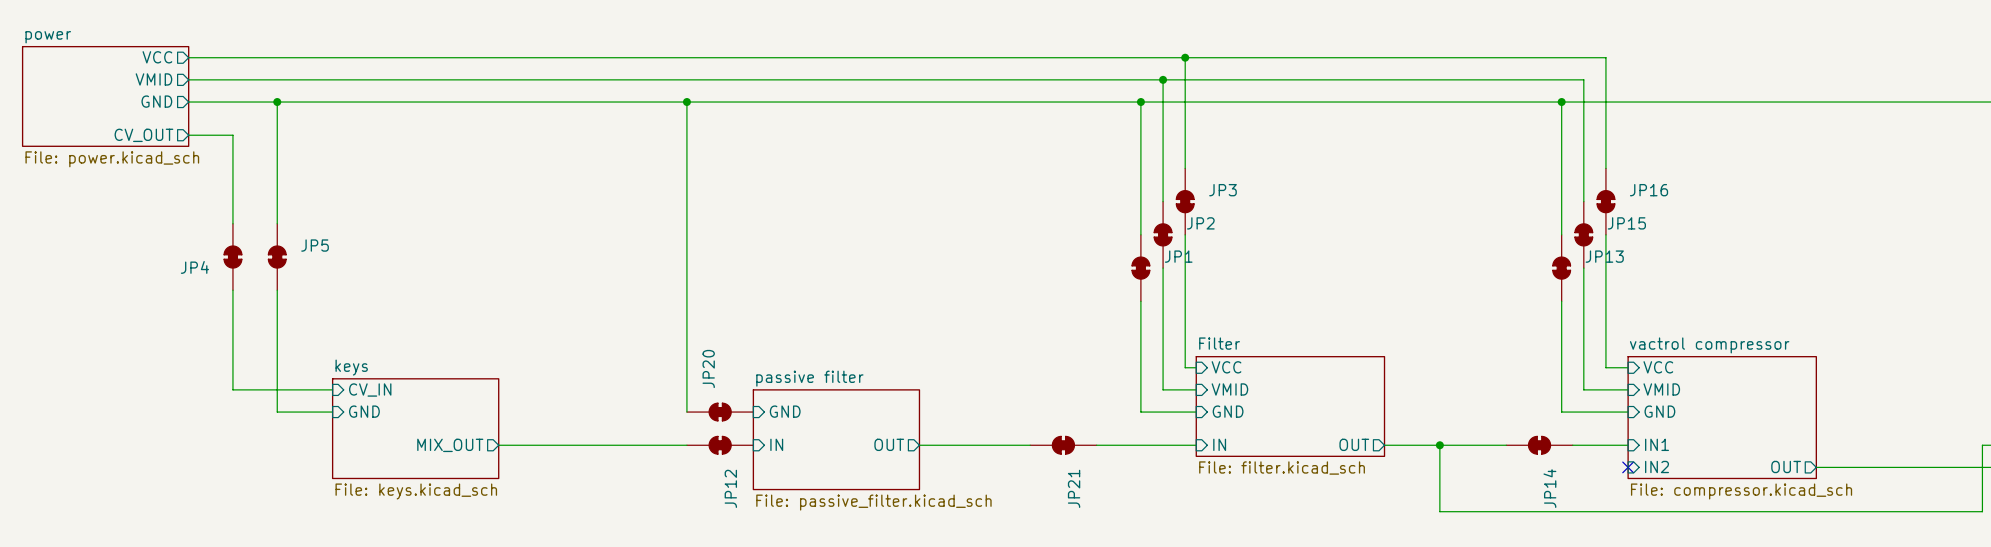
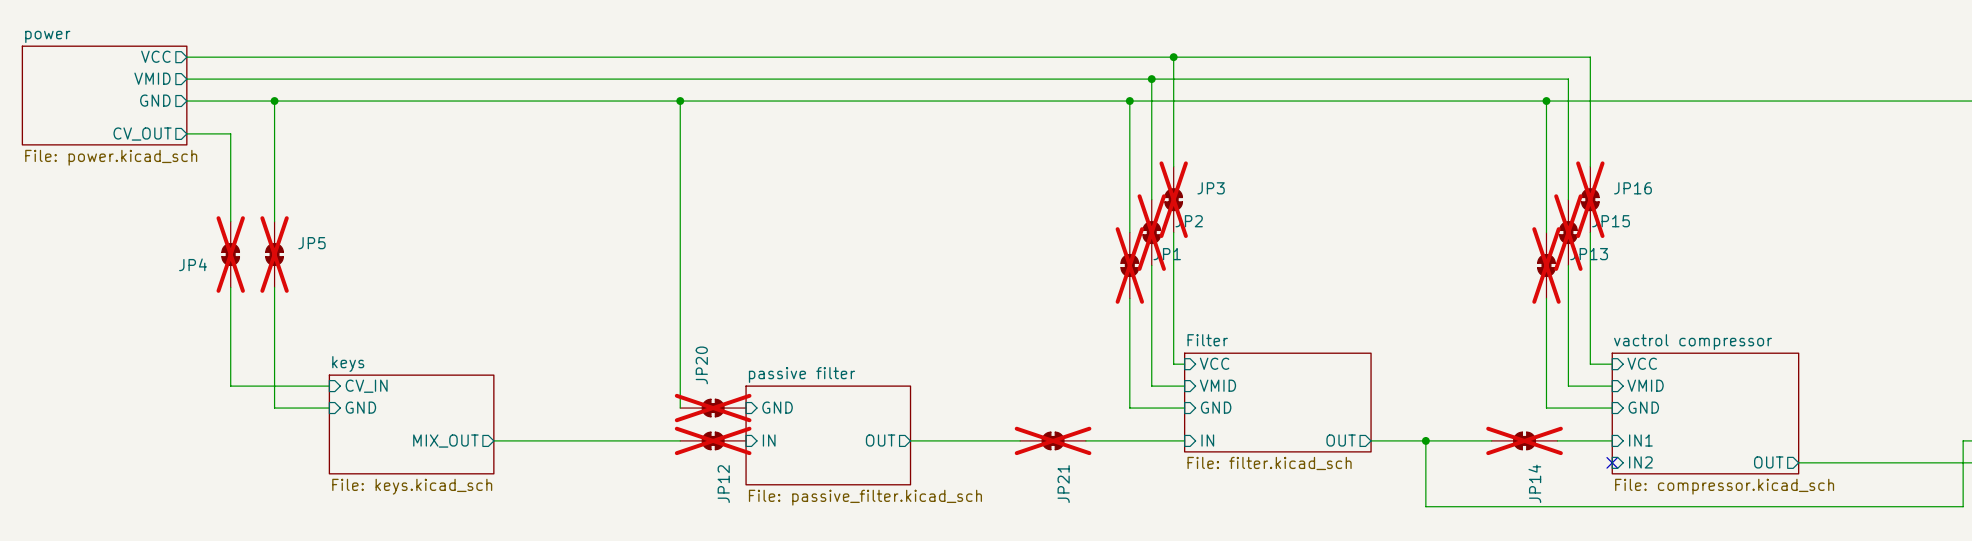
JP3 do-not-place cross: none -> (1173, 199)
JP16 do-not-place cross: none -> (1590, 199)
JP2 do-not-place cross: none -> (1151, 232)
JP15 do-not-place cross: none -> (1568, 232)
JP4 do-not-place cross: none -> (230, 254)
JP5 do-not-place cross: none -> (274, 254)
JP1 do-not-place cross: none -> (1129, 265)
JP13 do-not-place cross: none -> (1546, 265)
JP20 do-not-place cross: none -> (713, 408)
JP12 do-not-place cross: none -> (713, 440)
JP21 do-not-place cross: none -> (1053, 440)
JP14 do-not-place cross: none -> (1524, 440)

